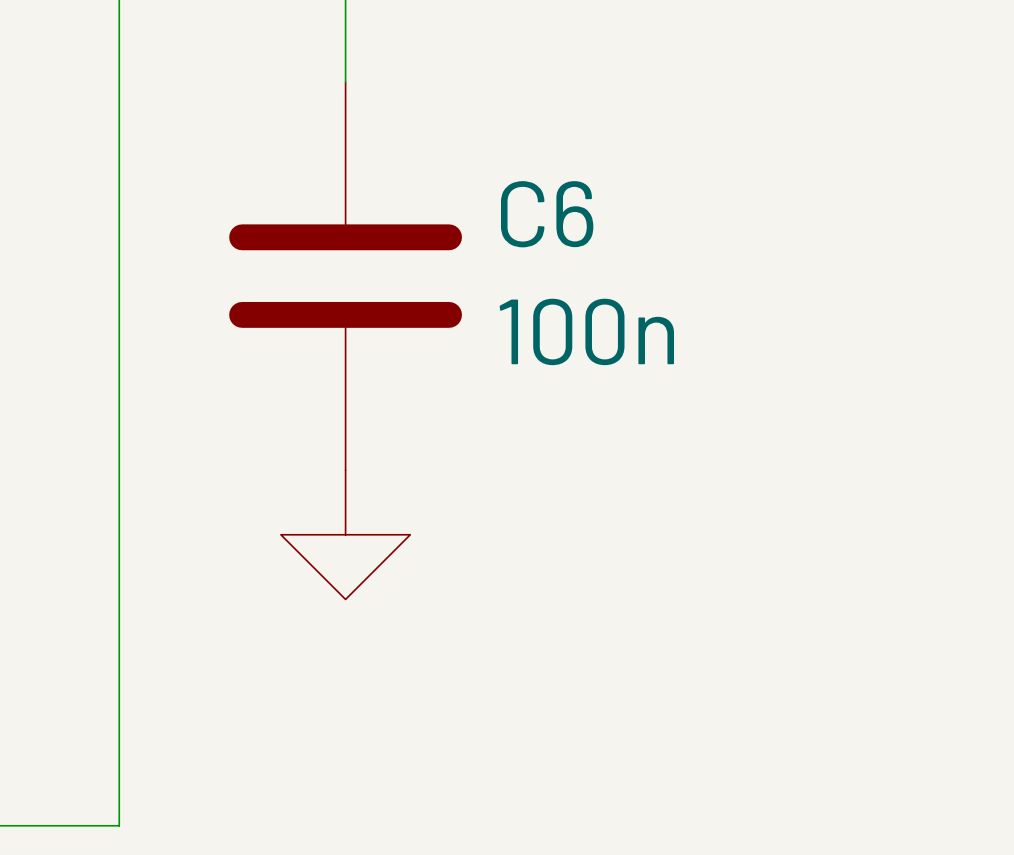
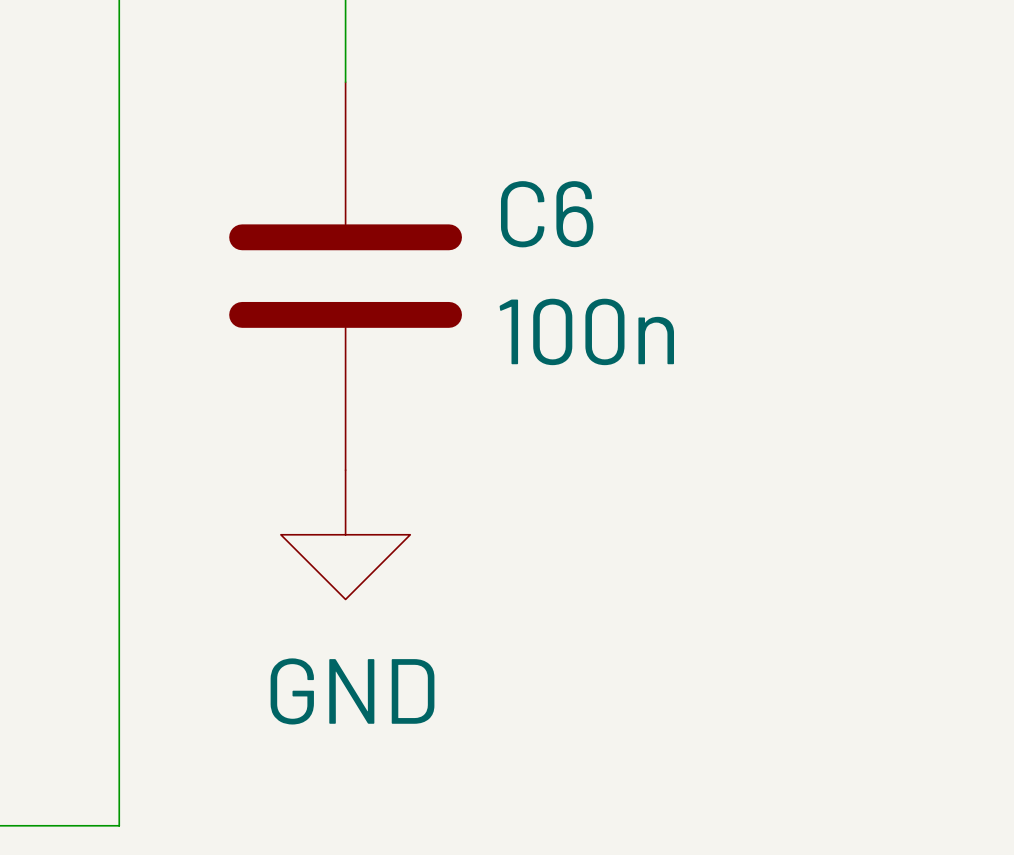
power symbol text: none -> GND (352, 691)

